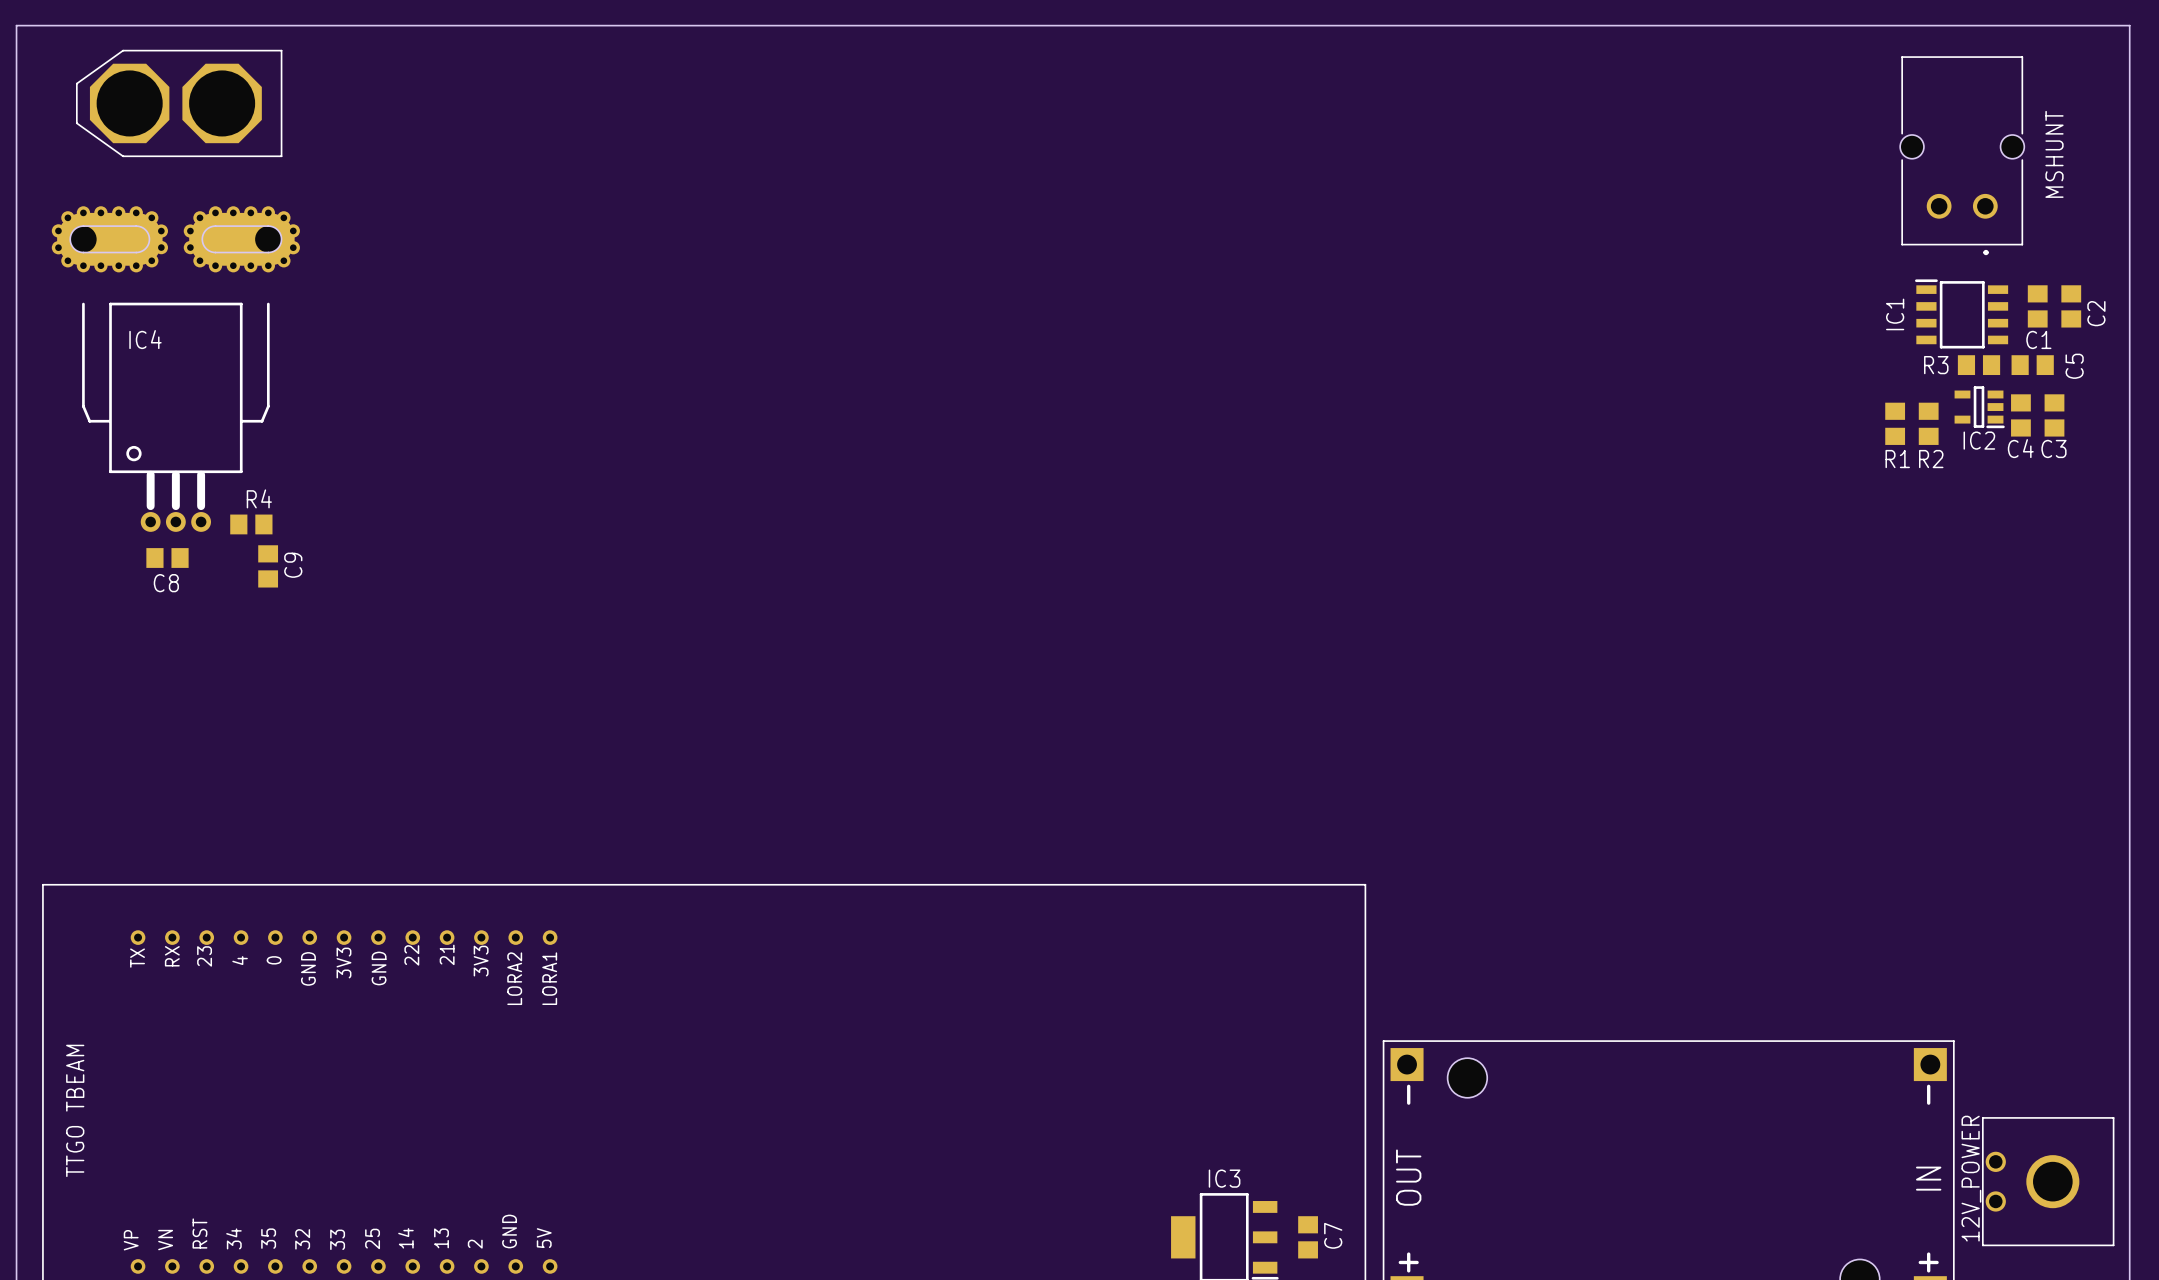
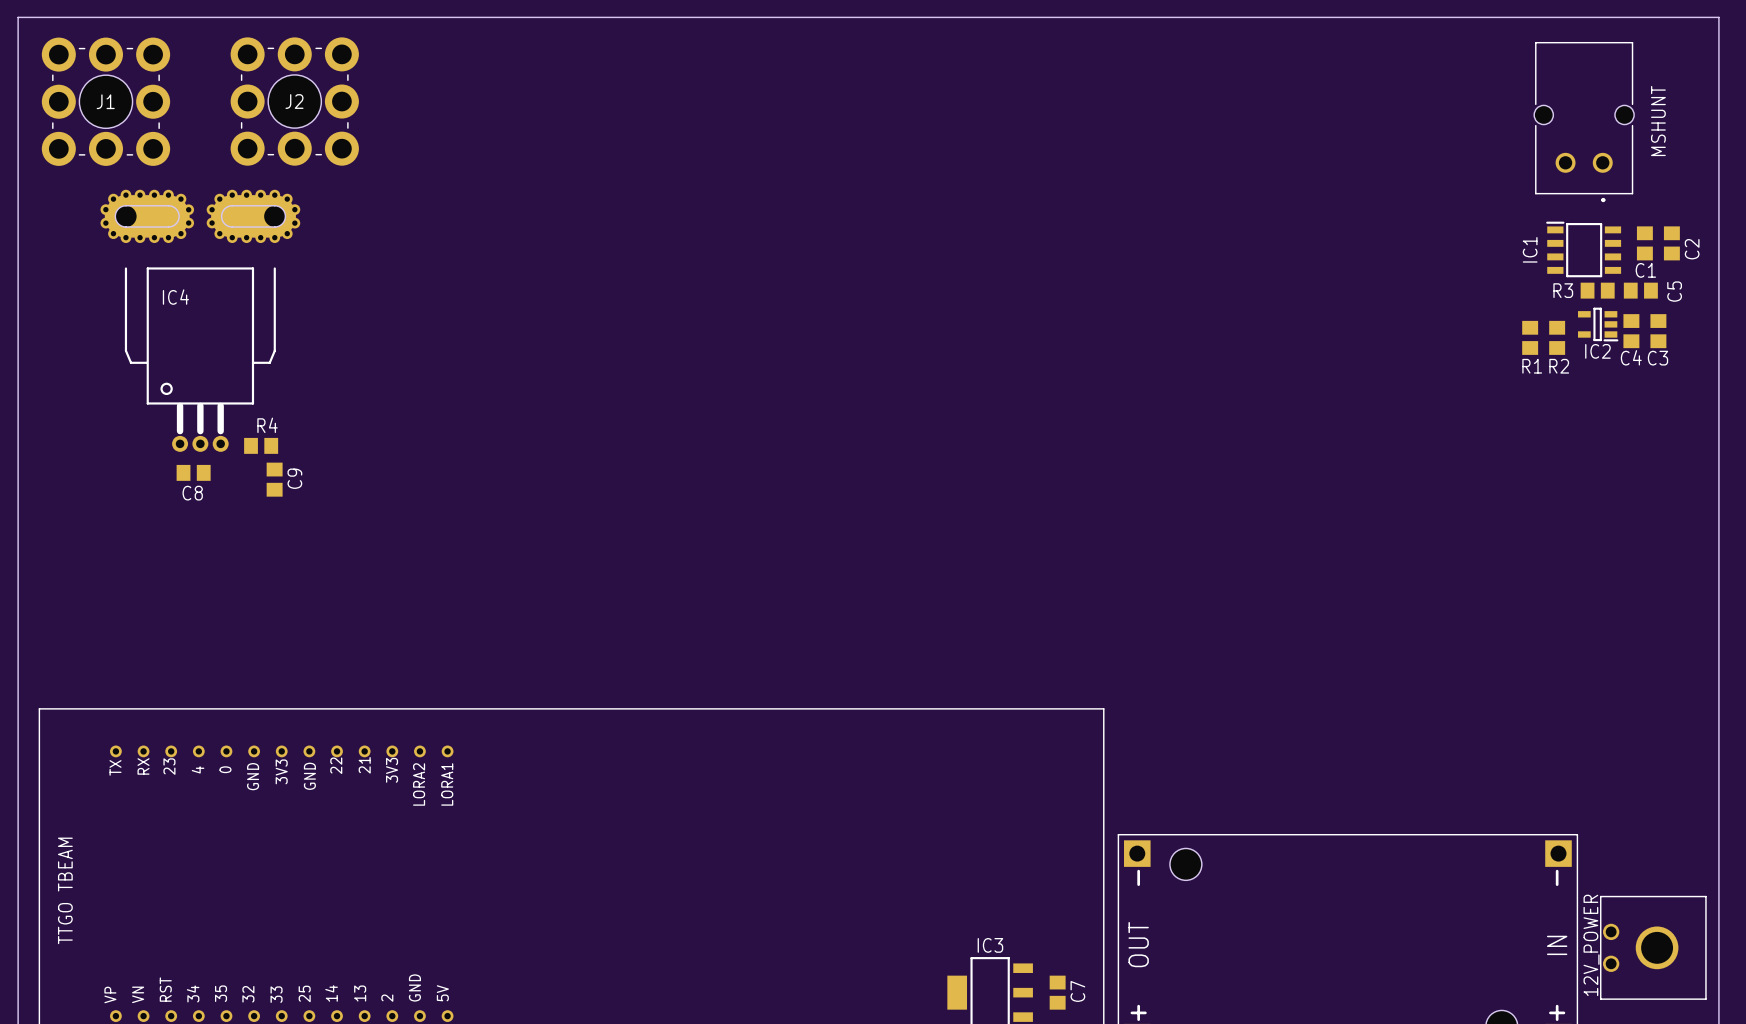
part: (179, 103) -> none
J1: none -> (105, 101)
J2: none -> (294, 101)
IC4 position: (175, 369) -> (200, 320)
R4 position: (251, 524) -> (261, 445)
C8 position: (167, 558) -> (193, 472)
C9 position: (268, 566) -> (274, 479)

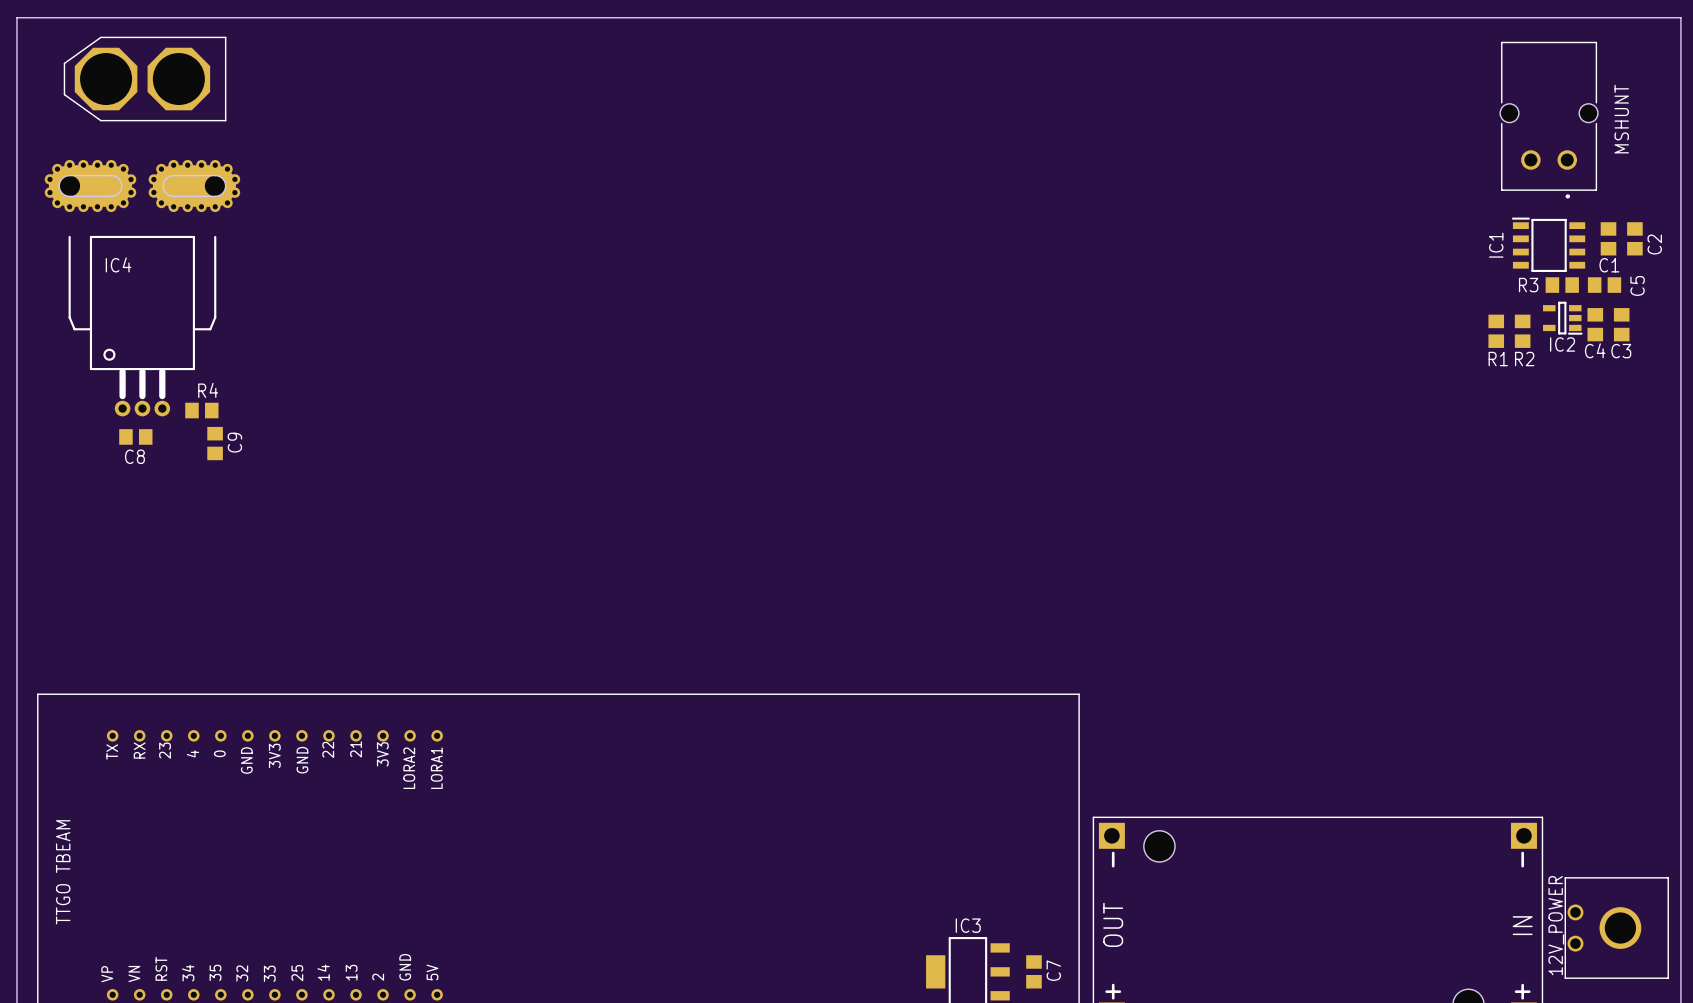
part: none -> (145, 79)
J1: (105, 101) -> none
J2: (294, 101) -> none
IC4 position: (200, 320) -> (142, 288)
R4 position: (261, 445) -> (201, 410)
C8 position: (193, 472) -> (135, 436)
C9 position: (274, 479) -> (215, 443)

